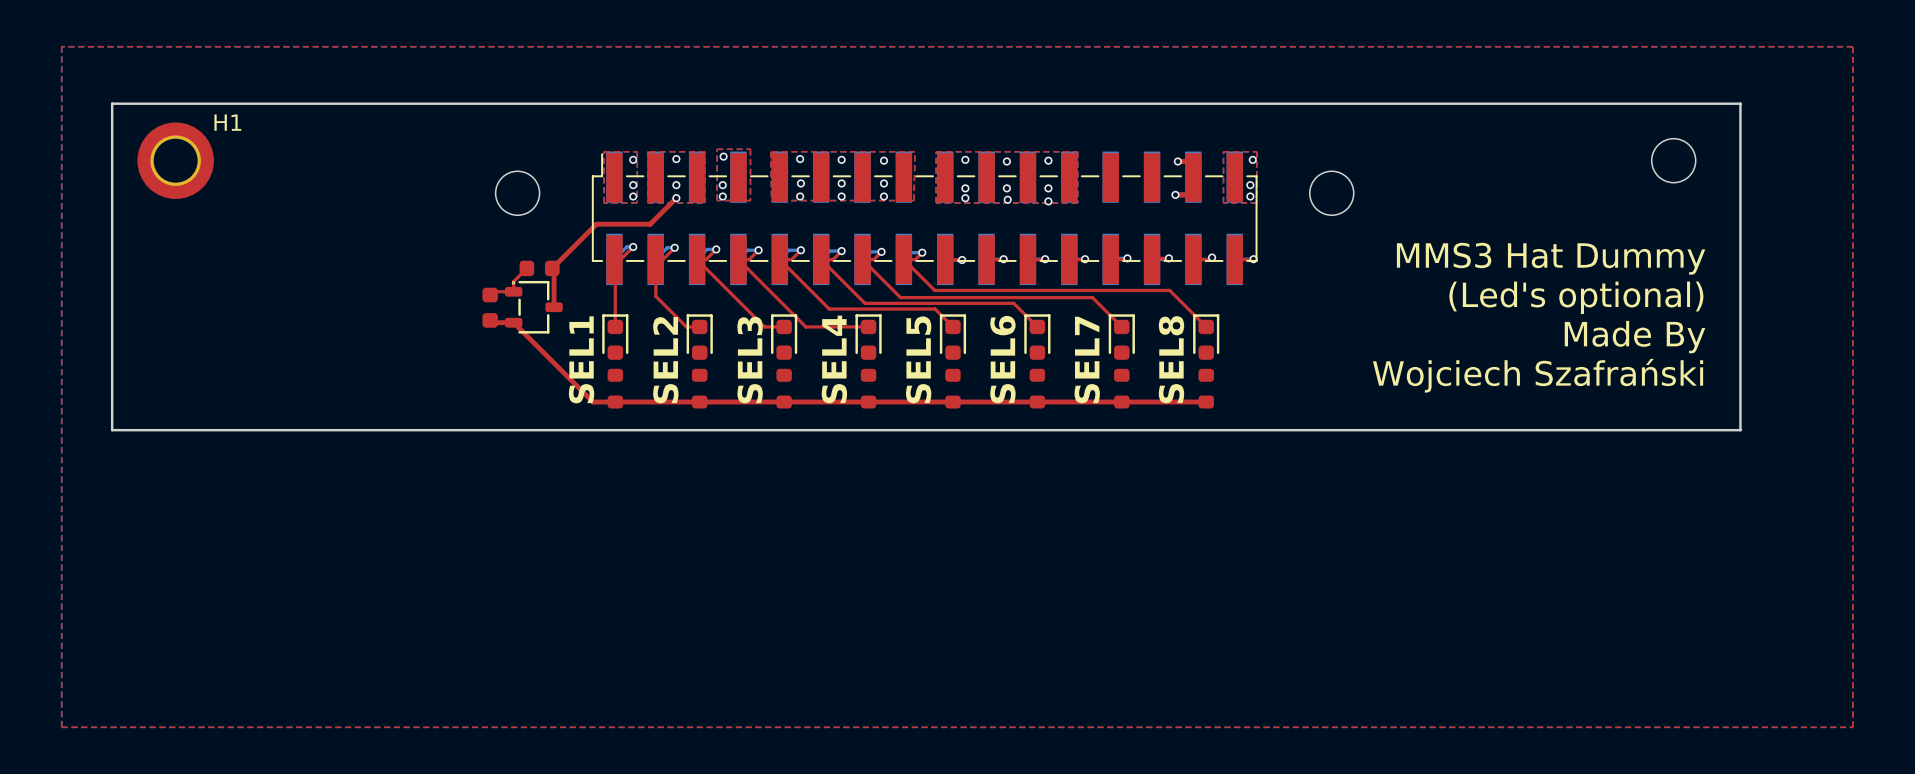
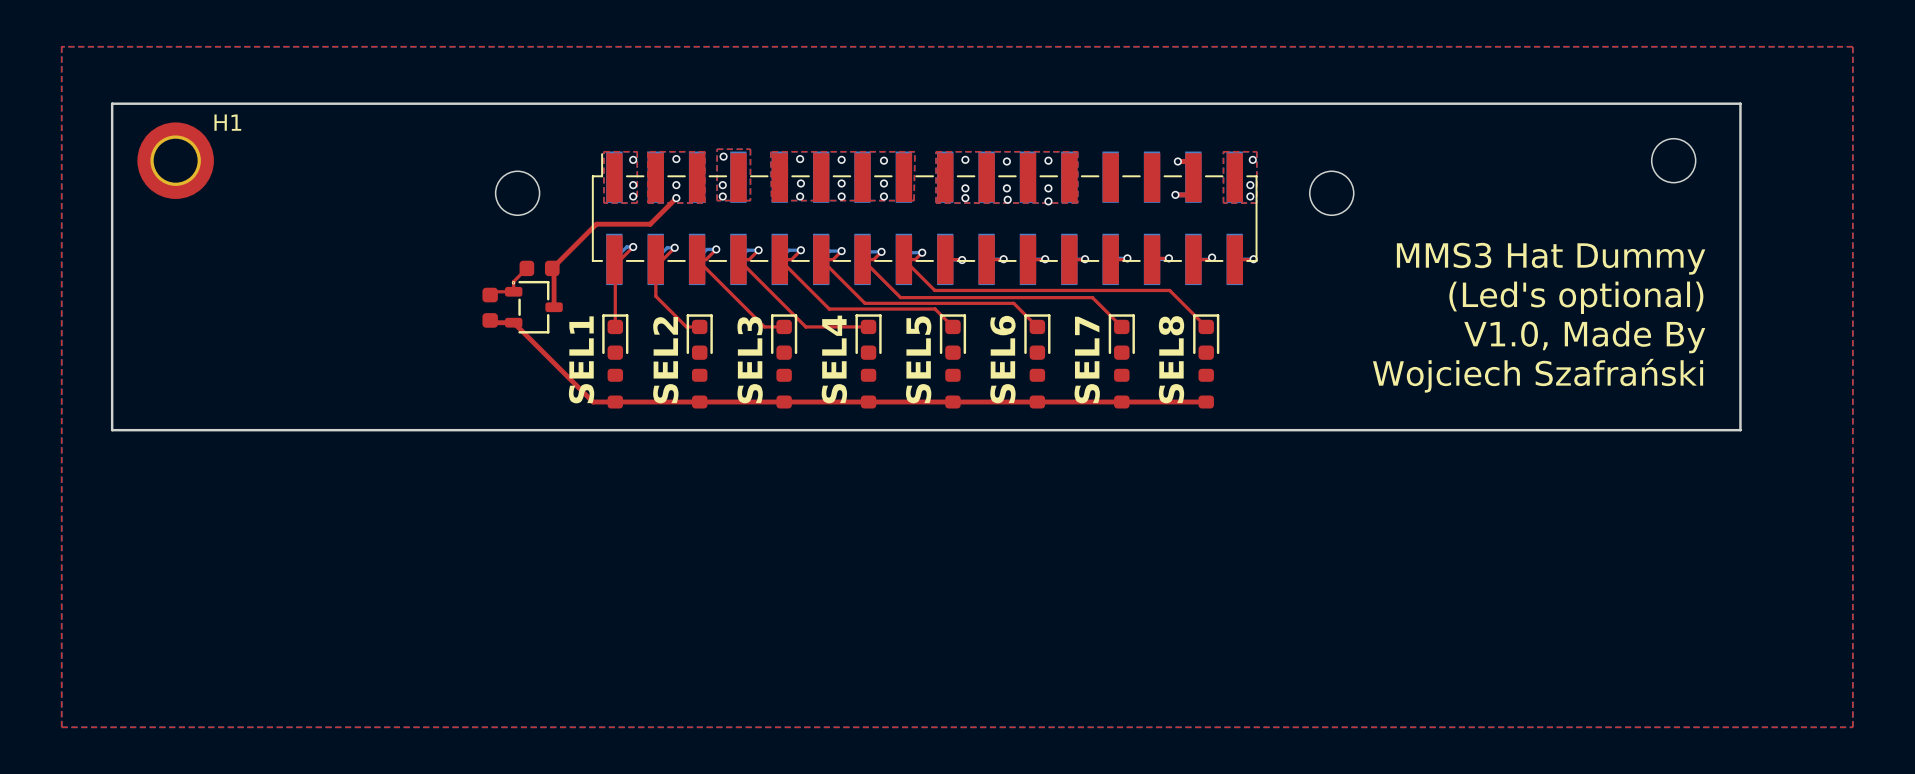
text: Made By (1635, 337) -> V1.0, Made By (1584, 337)

